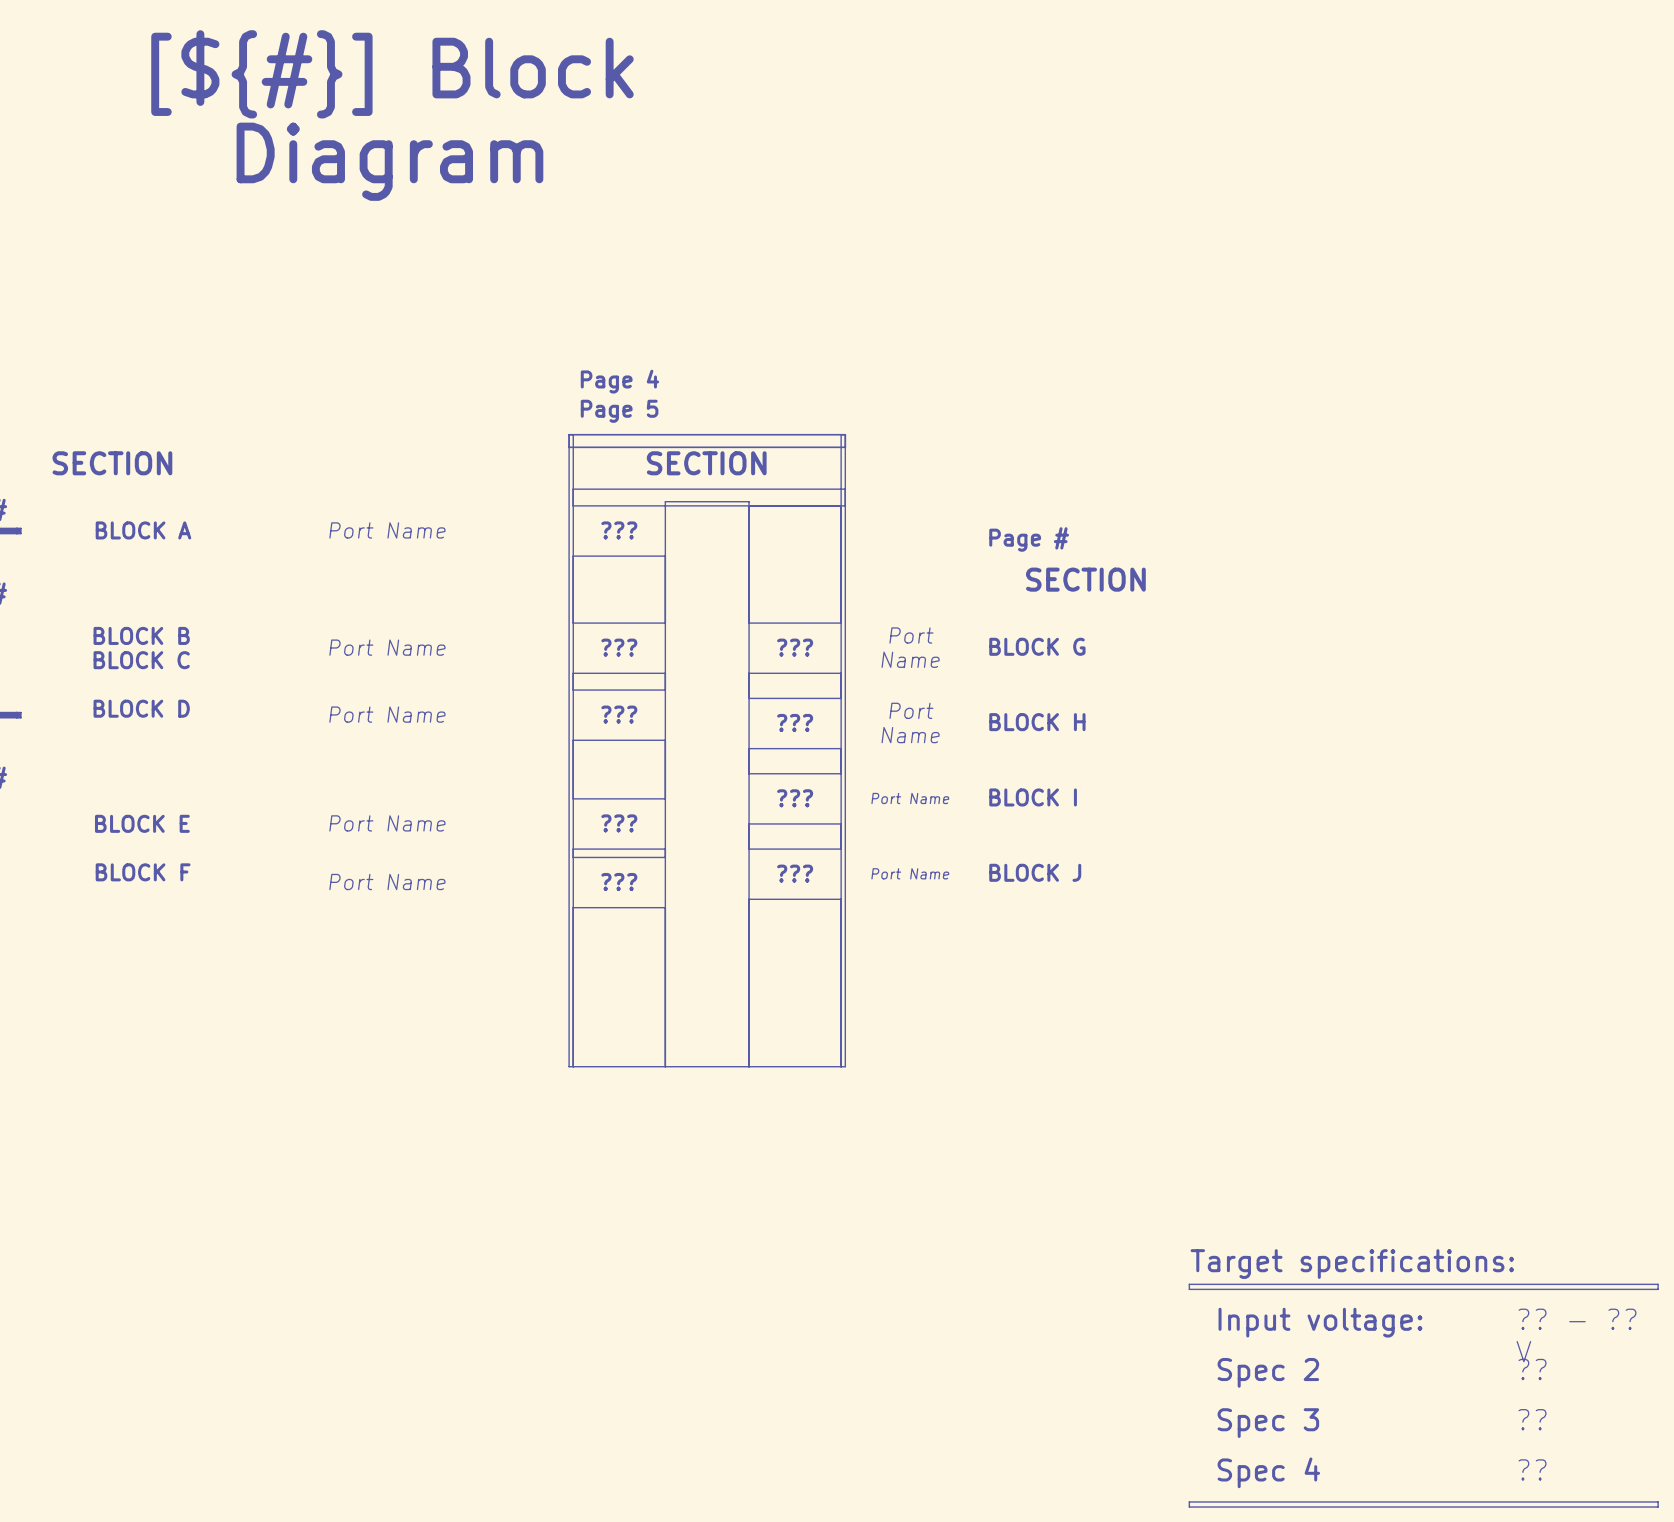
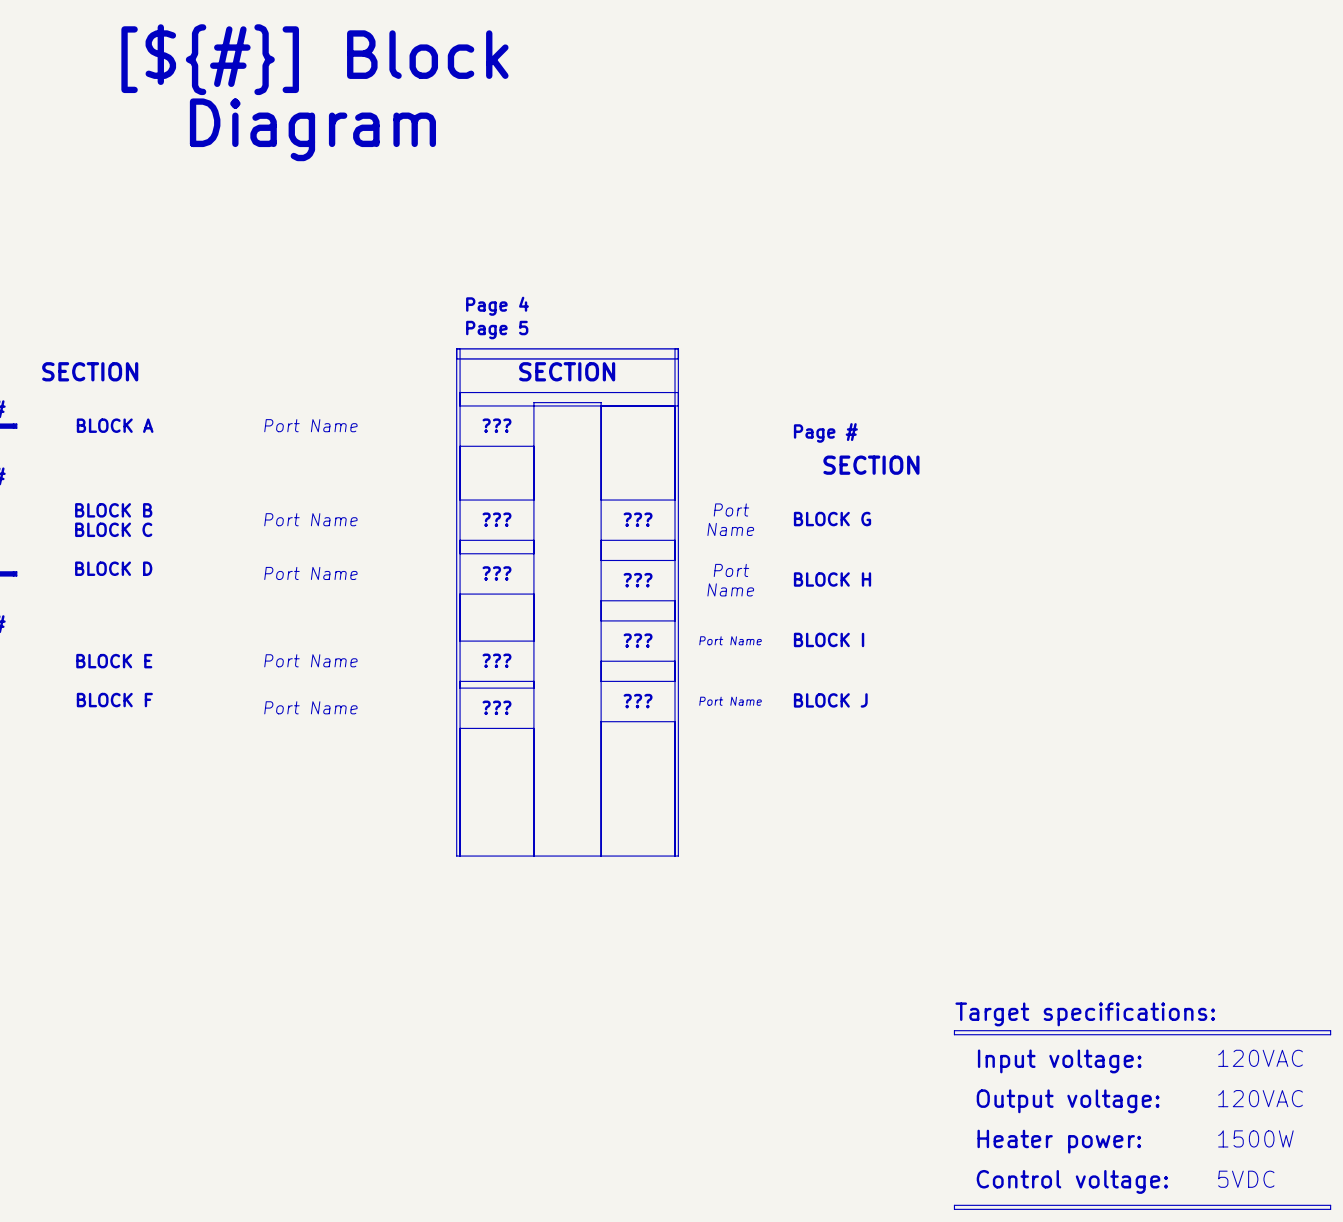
text: ?? - ?? (1577, 1319) -> 120VAC (1260, 1058)
text: V (1523, 1351) -> none
text: ?? (1532, 1369) -> 120VAC (1260, 1098)
text: Spec 2 (1268, 1372) -> Output voltage: (1068, 1101)
text: ?? (1532, 1419) -> 1500W (1255, 1138)
text: Spec 3 (1268, 1423) -> Heater power: (1059, 1141)
text: ?? (1532, 1469) -> 5VDC (1246, 1179)
text: Spec 4 (1268, 1472) -> Control voltage: (1072, 1181)

